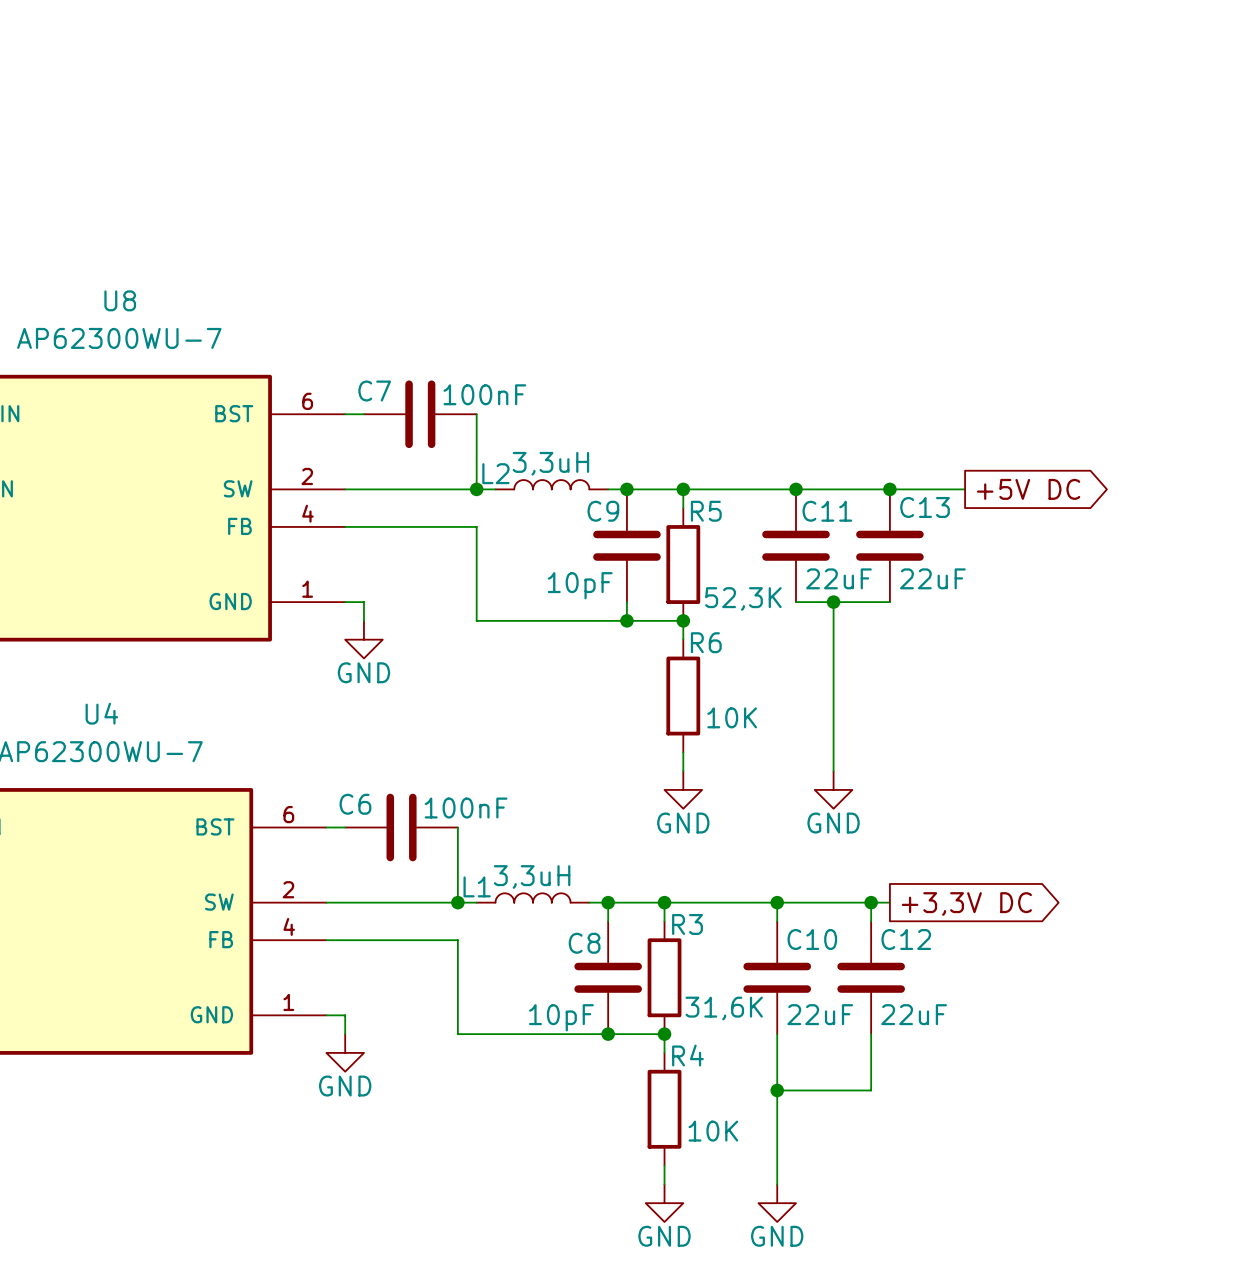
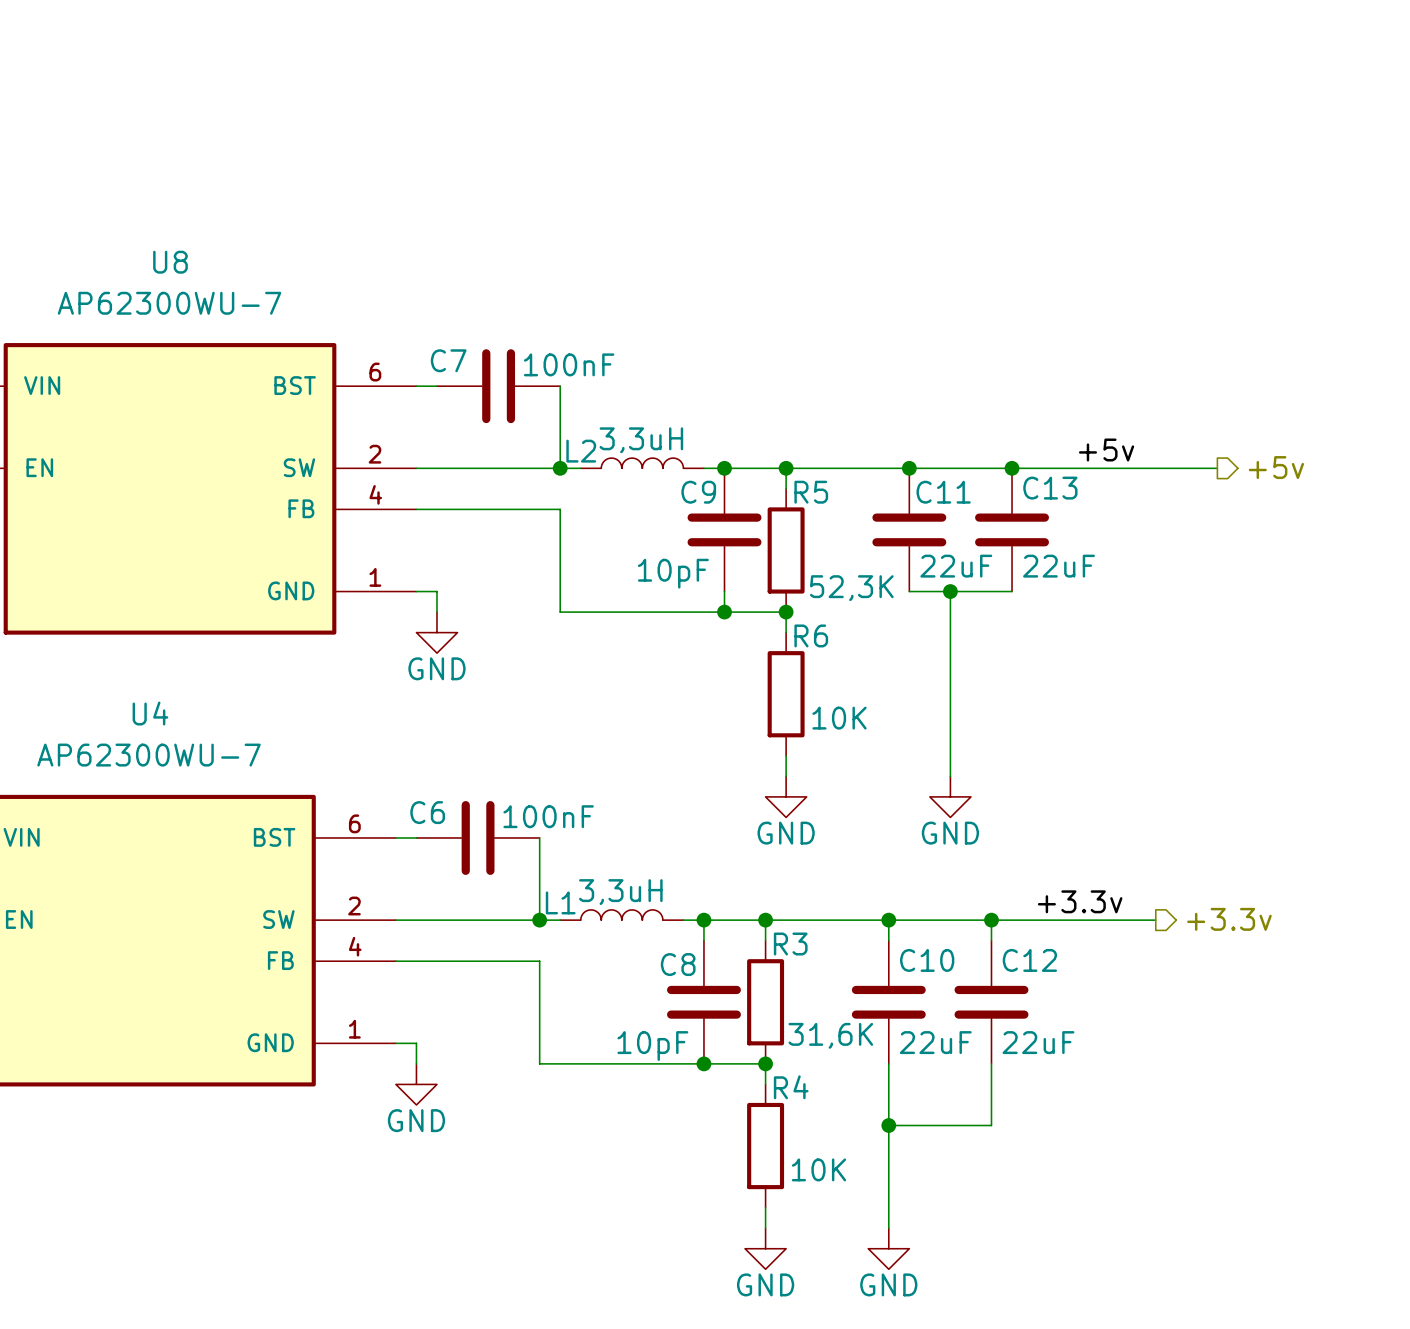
label: none -> +5v (1106, 450)
hierarchical label: none -> +5v (1276, 467)
wire: none -> (1094, 468) (1217, 468)
global label: +5V DC (1028, 489) -> none
label: none -> +3.3v (1080, 901)
hierarchical label: none -> +3.3v (1229, 919)
wire: none -> (1012, 920) (1155, 920)
global label: +3,3V DC (966, 903) -> none

